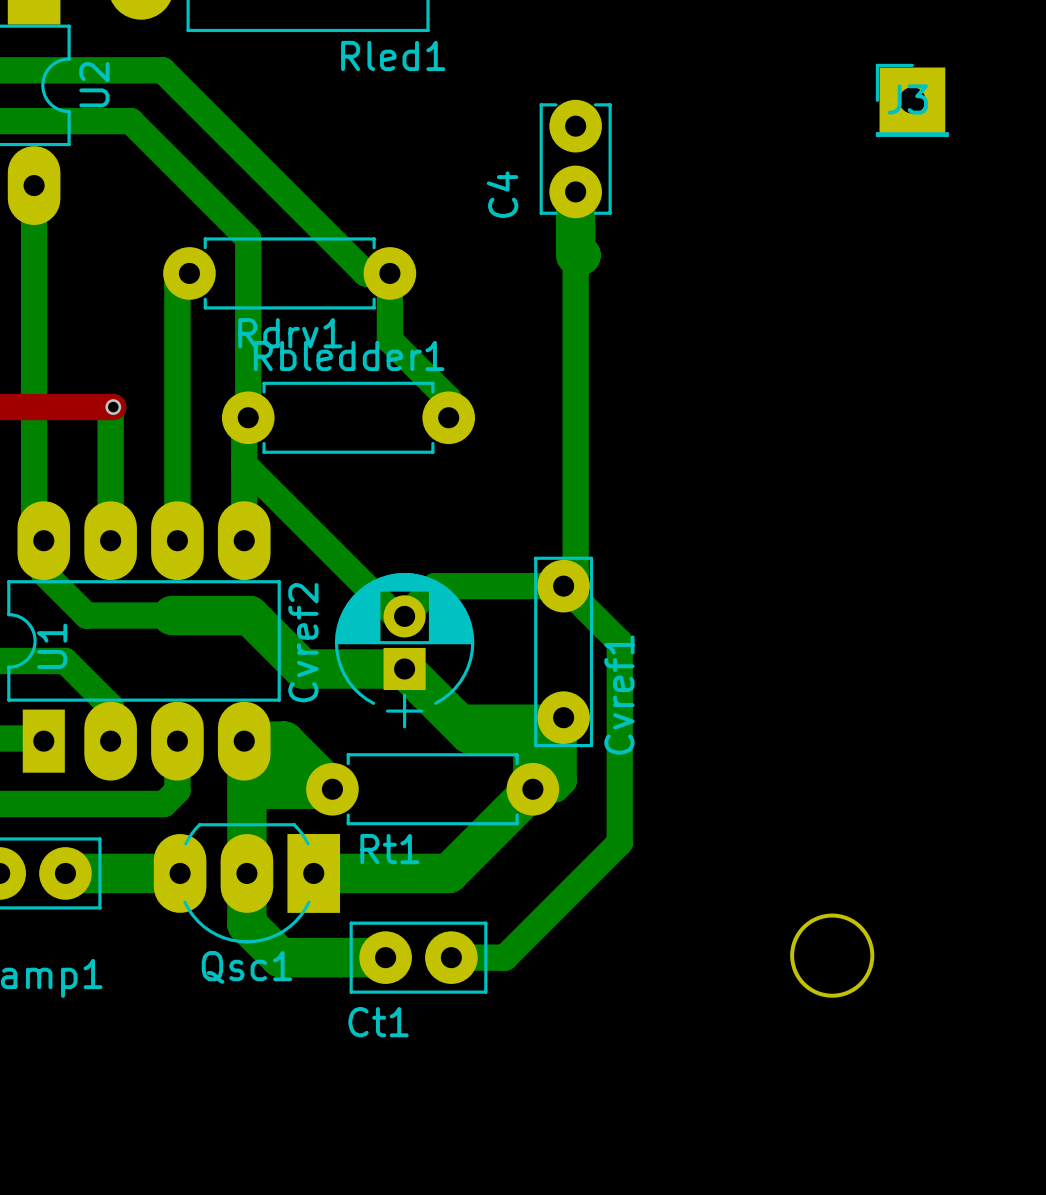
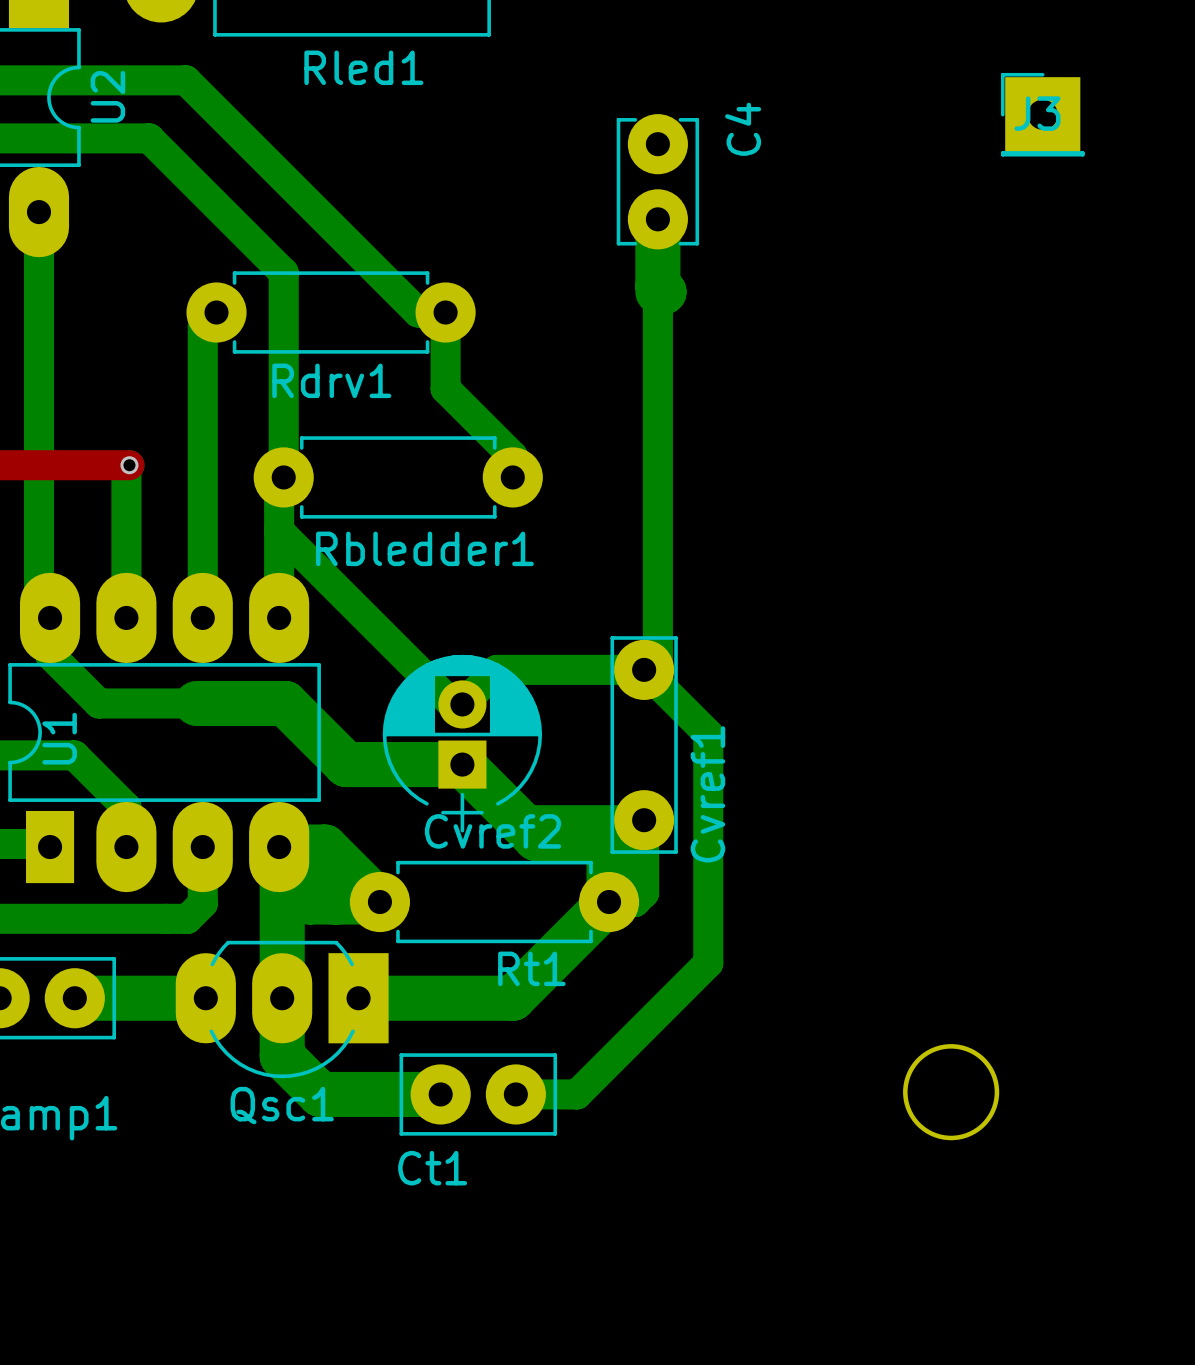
Rled1 name position: Rled1 (393, 55) -> Rled1 (363, 67)
C4 name position: C4 (502, 194) -> C4 (743, 129)
Rbledder1 name position: Rbledder1 (349, 356) -> Rbledder1 (424, 548)
Cvref2 name rotation: 0° (303, 642) -> 90° clockwise (492, 831)
Rt1 name position: Rt1 (389, 849) -> Rt1 (531, 968)

